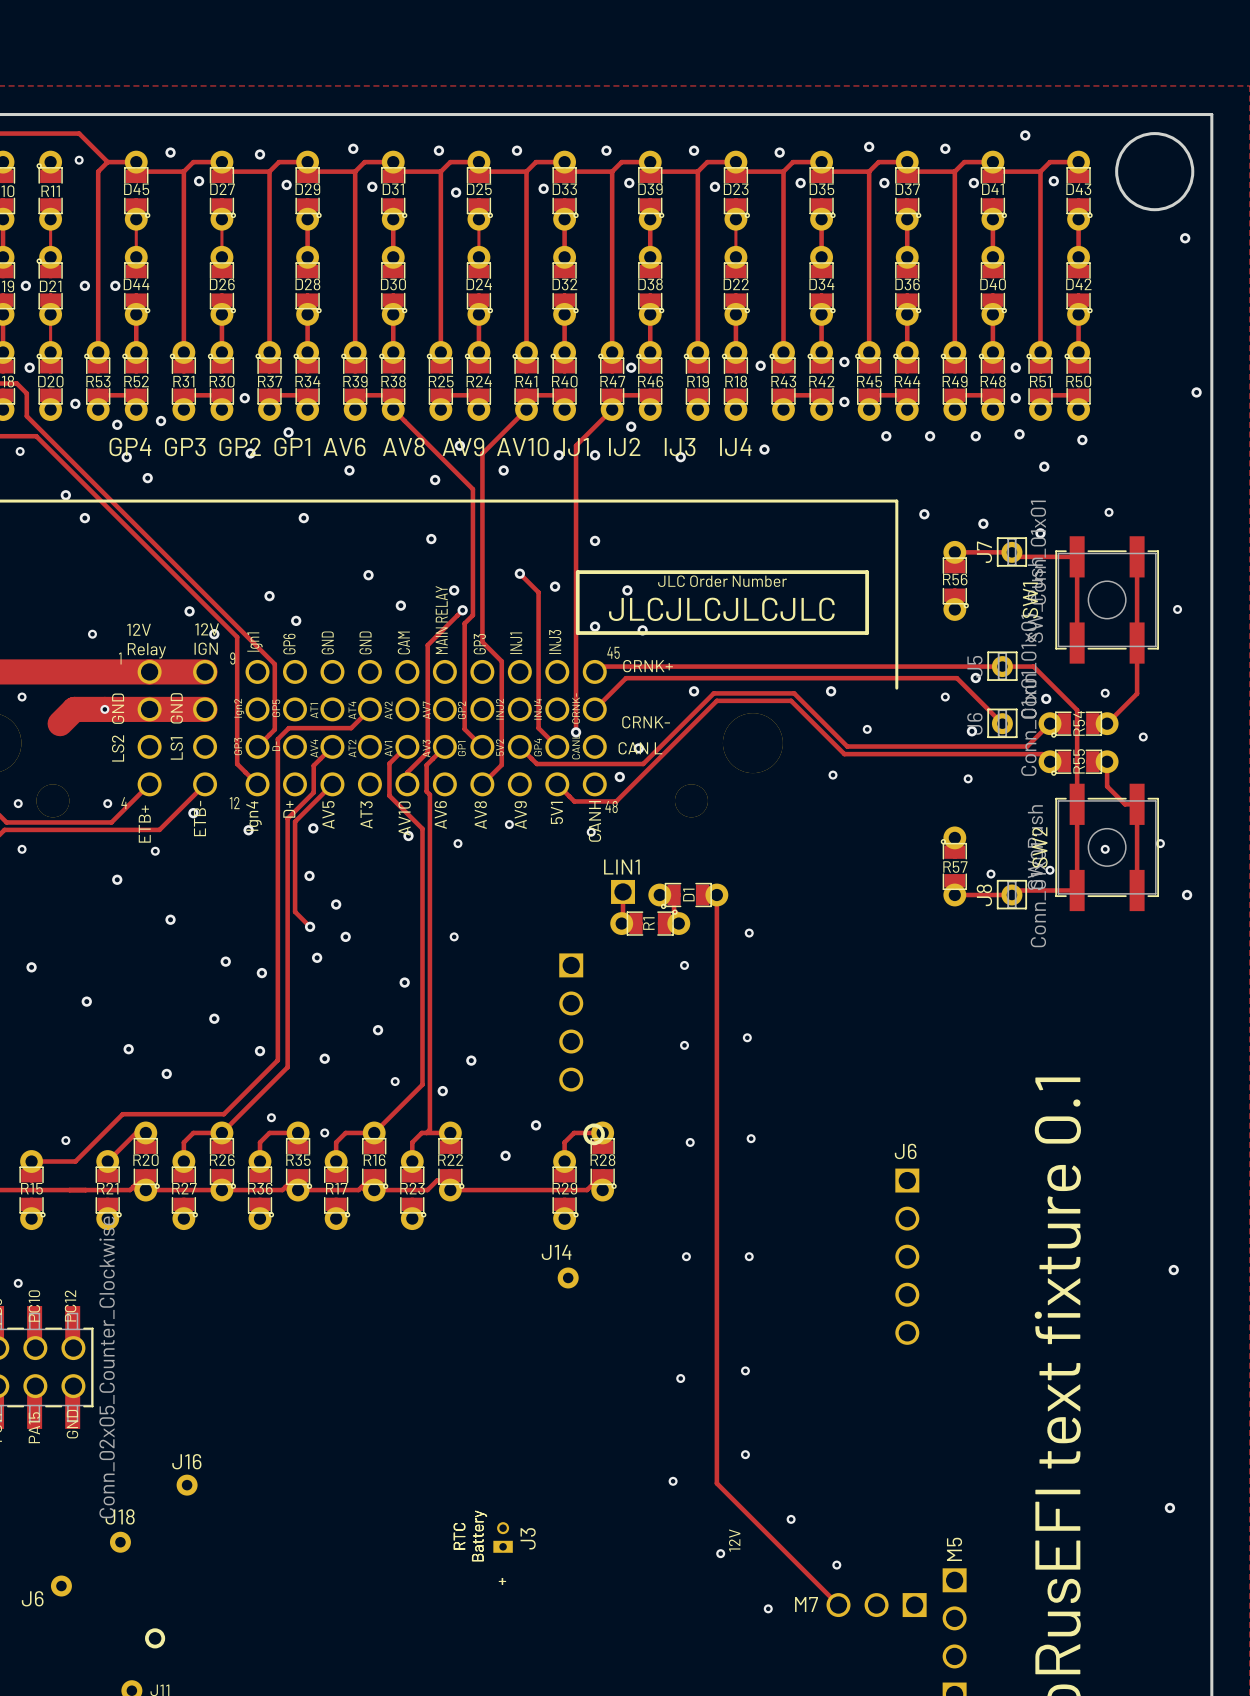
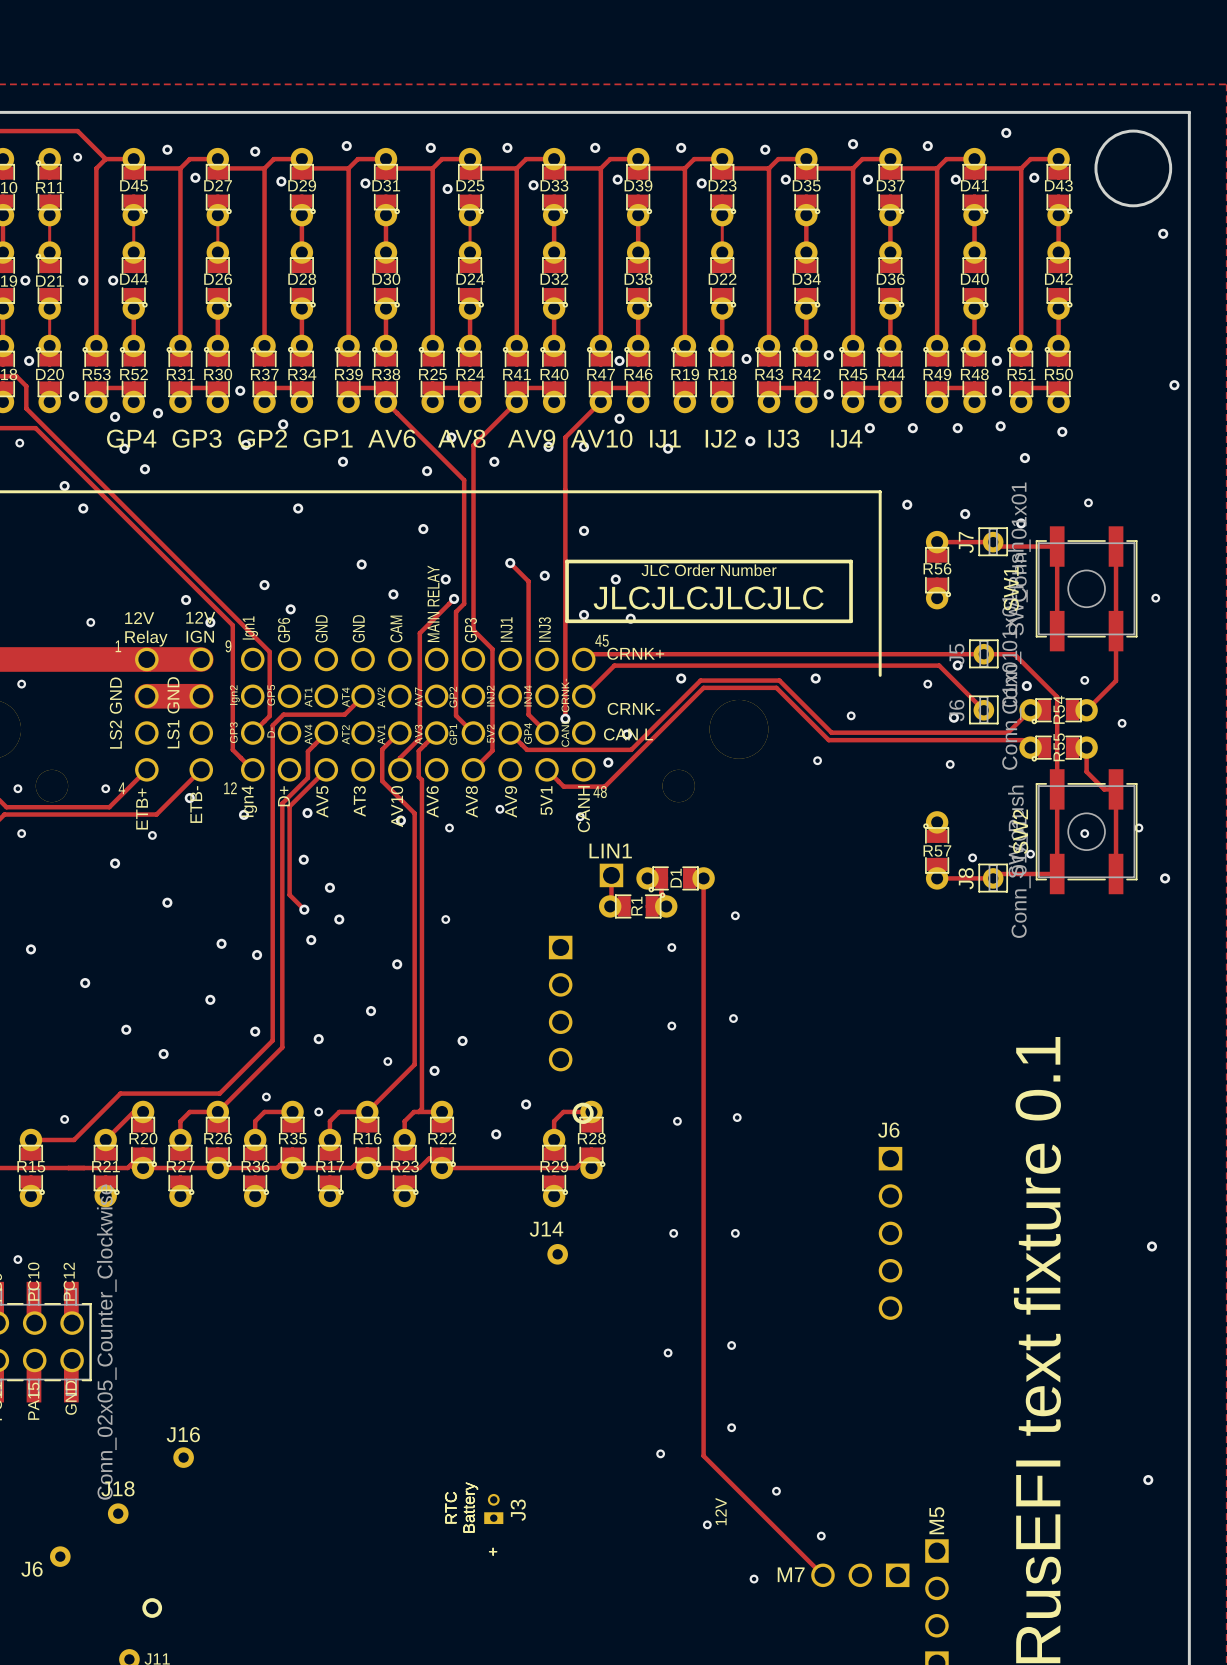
via: (104, 709) -> none
track: (149, 709) (74, 709) (60, 723) -> none

